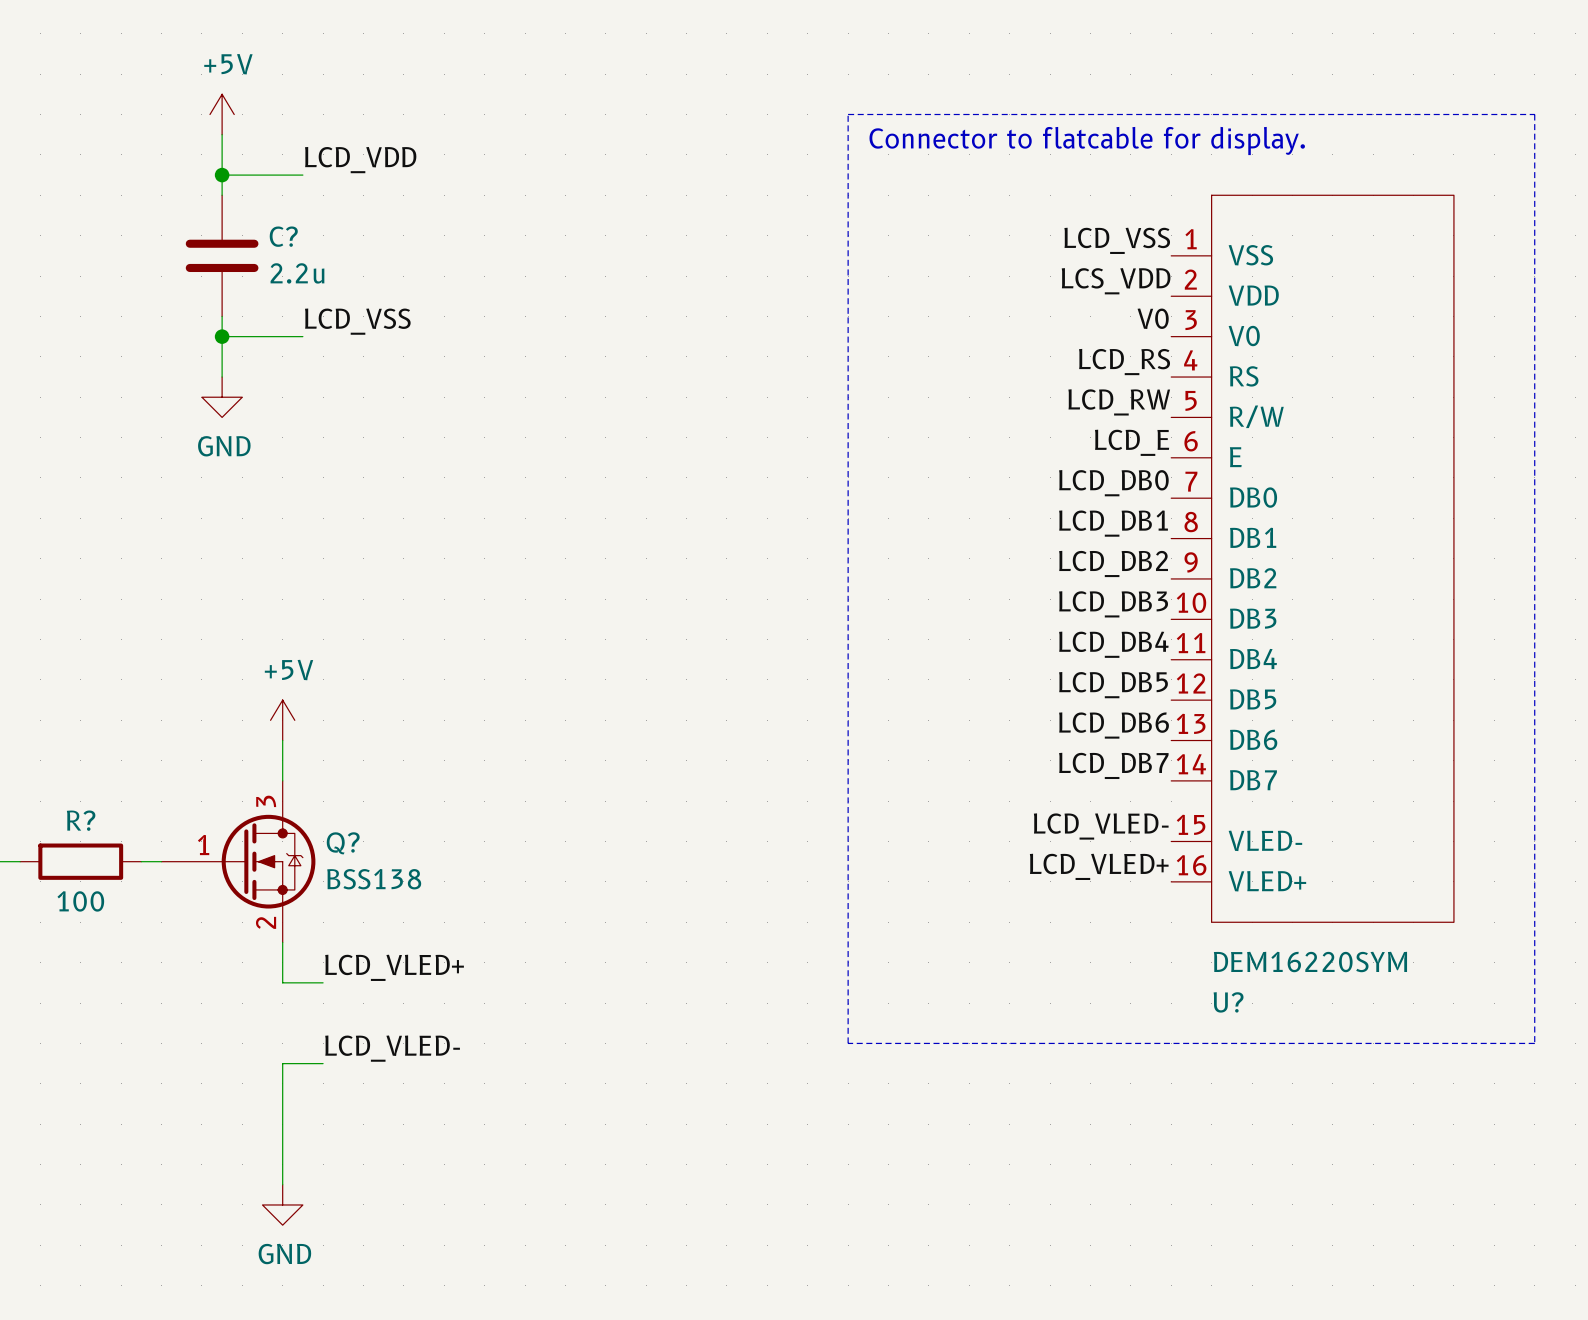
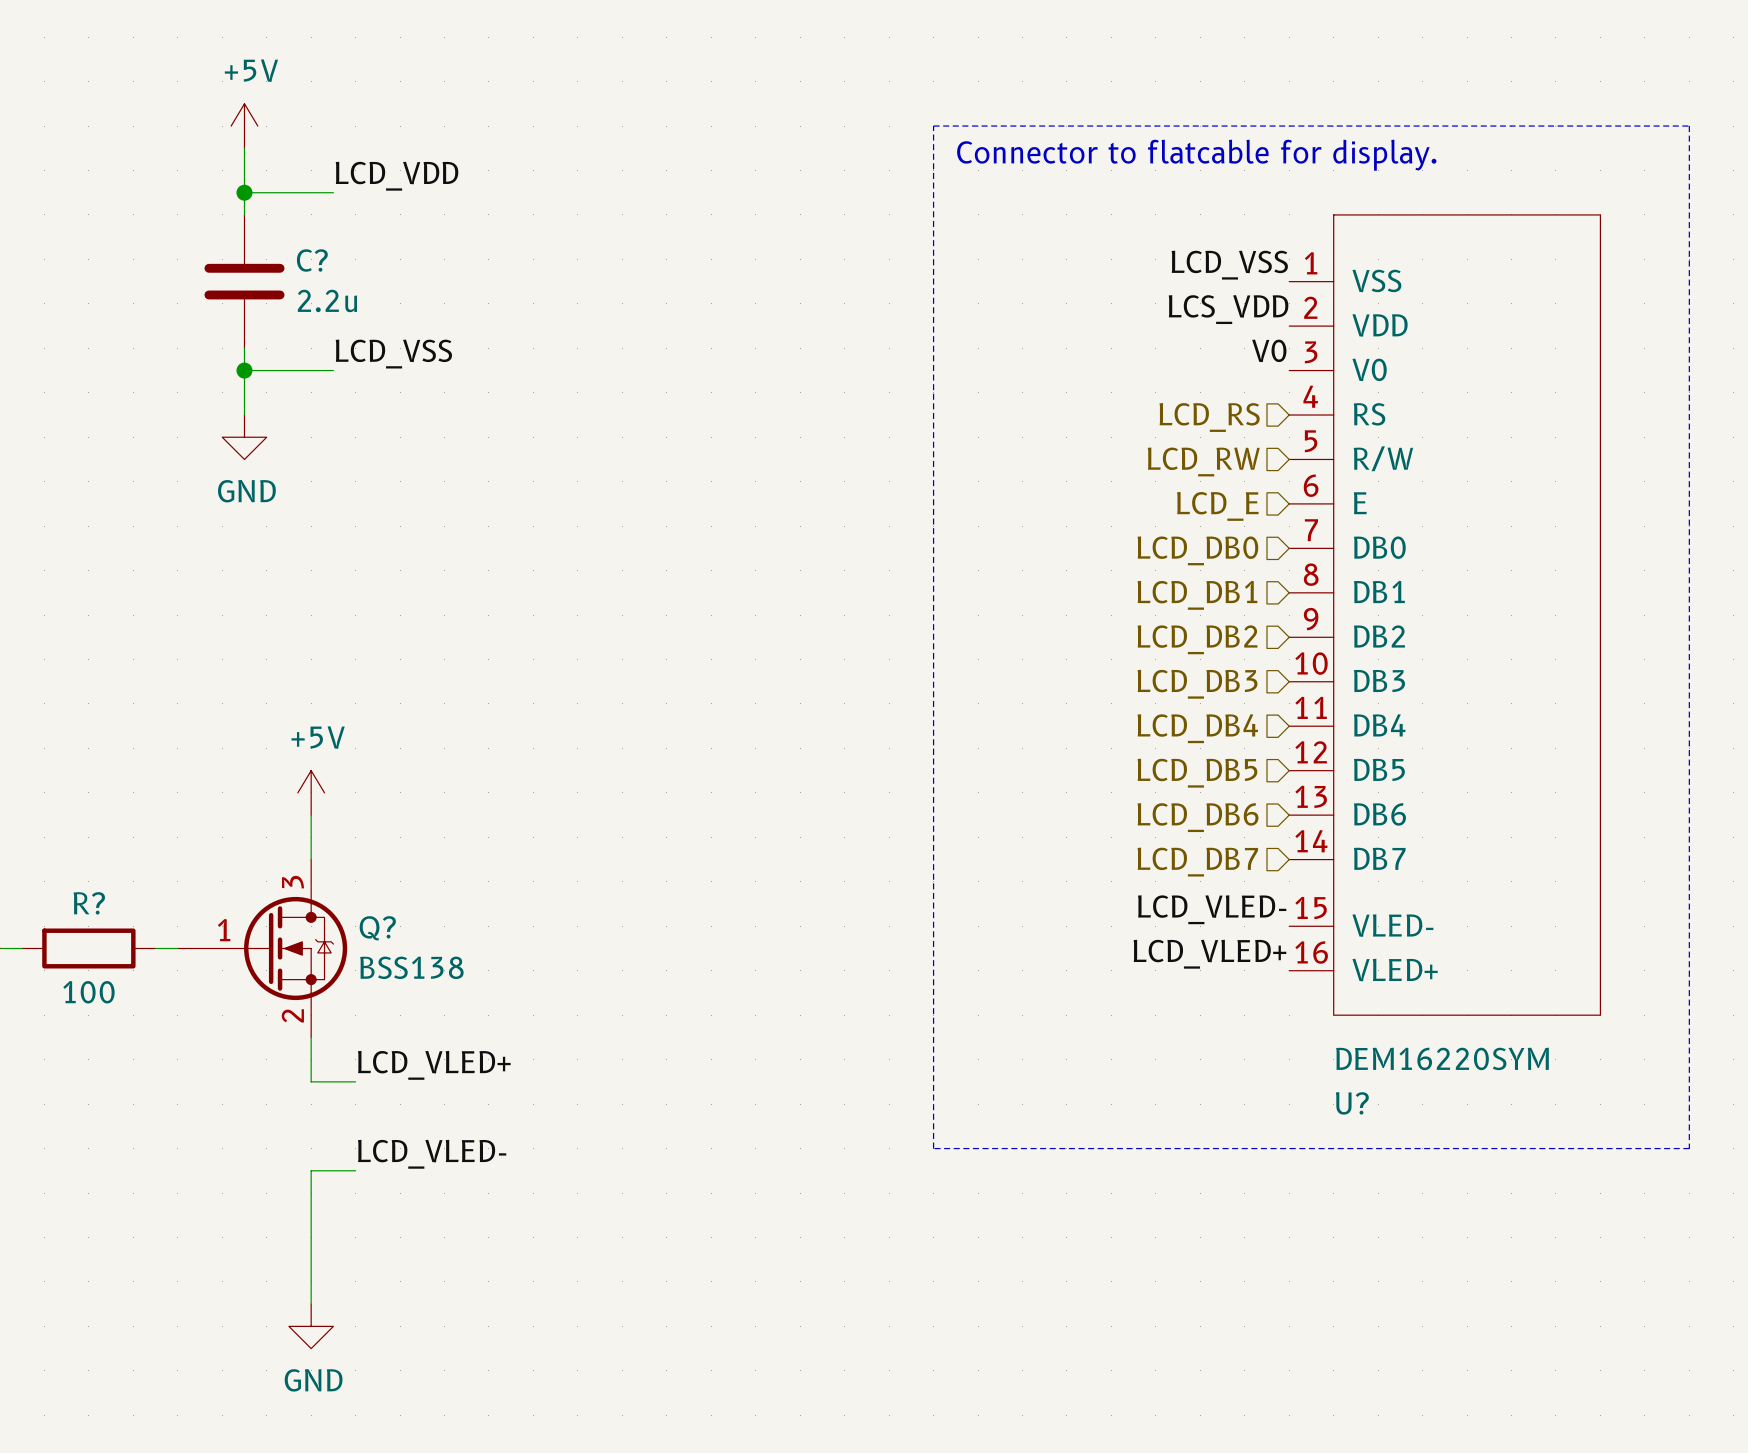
label: LCD_RS (1124, 362) -> none
hierarchical label: none -> LCD_RS (1209, 417)
label: LCD_RW (1119, 402) -> none
hierarchical label: none -> LCD_RW (1203, 461)
label: LCD_E (1132, 442) -> none
hierarchical label: none -> LCD_E (1217, 506)
label: LCD_DB0 (1113, 483) -> none
hierarchical label: none -> LCD_DB0 (1197, 550)
label: LCD_DB1 (1113, 523) -> none
hierarchical label: none -> LCD_DB1 (1197, 595)
label: LCD_DB2 (1113, 563) -> none
hierarchical label: none -> LCD_DB2 (1197, 639)
label: LCD_DB3 (1113, 604) -> none
hierarchical label: none -> LCD_DB3 (1197, 684)
label: LCD_DB4 (1113, 644) -> none
hierarchical label: none -> LCD_DB4 (1197, 728)
label: LCD_DB5 (1113, 685) -> none
hierarchical label: none -> LCD_DB5 (1197, 773)
label: LCD_DB6 (1114, 725) -> none
hierarchical label: none -> LCD_DB6 (1198, 817)
label: LCD_DB7 (1113, 765) -> none
hierarchical label: none -> LCD_DB7 (1197, 862)

